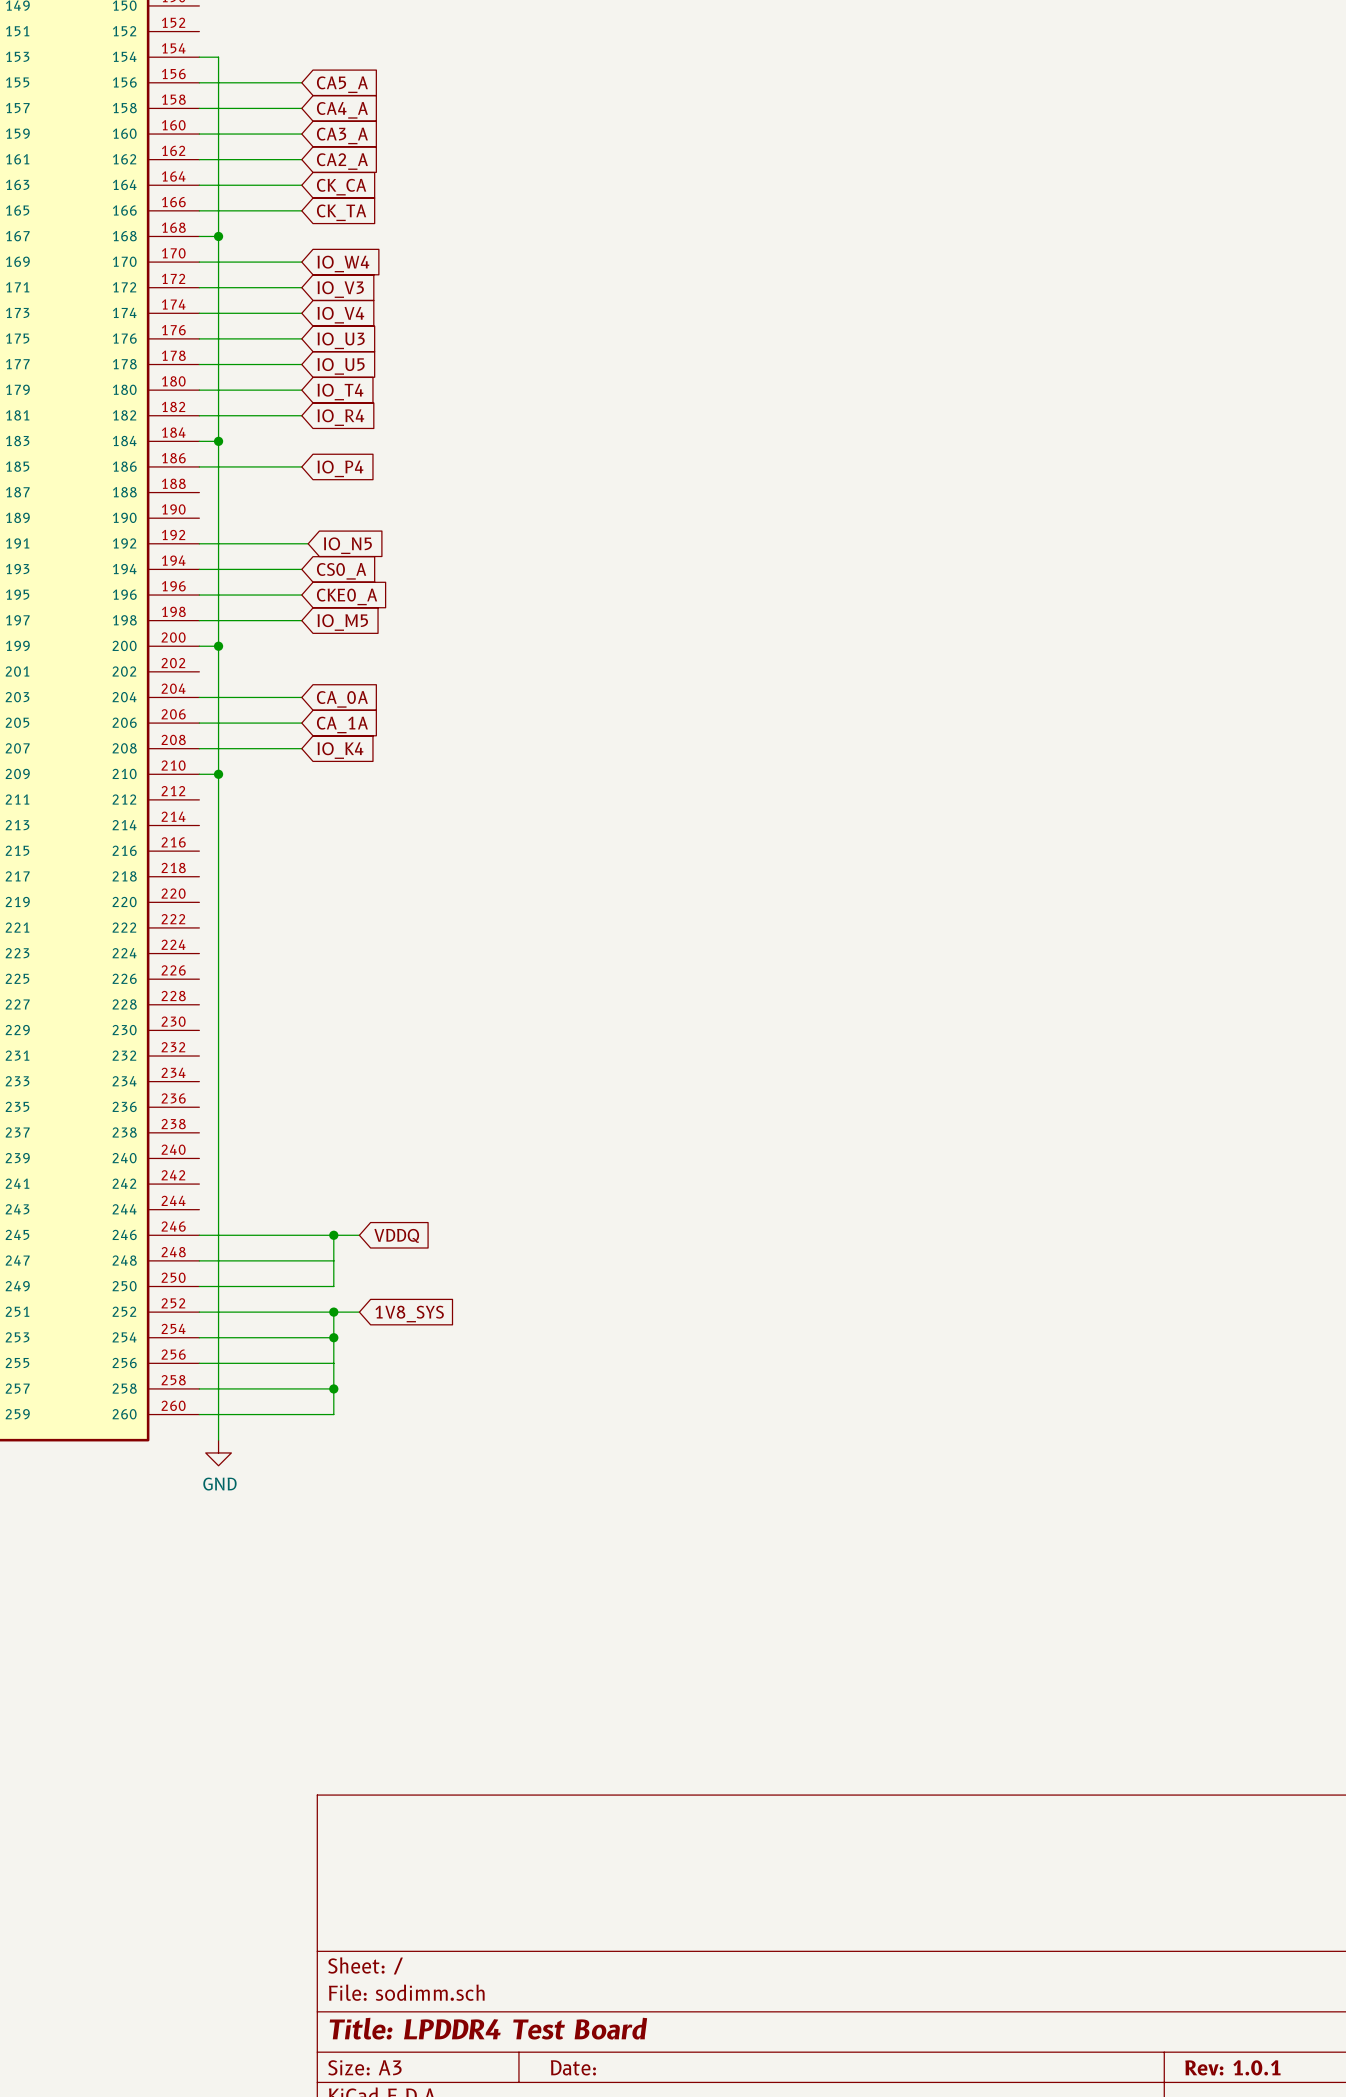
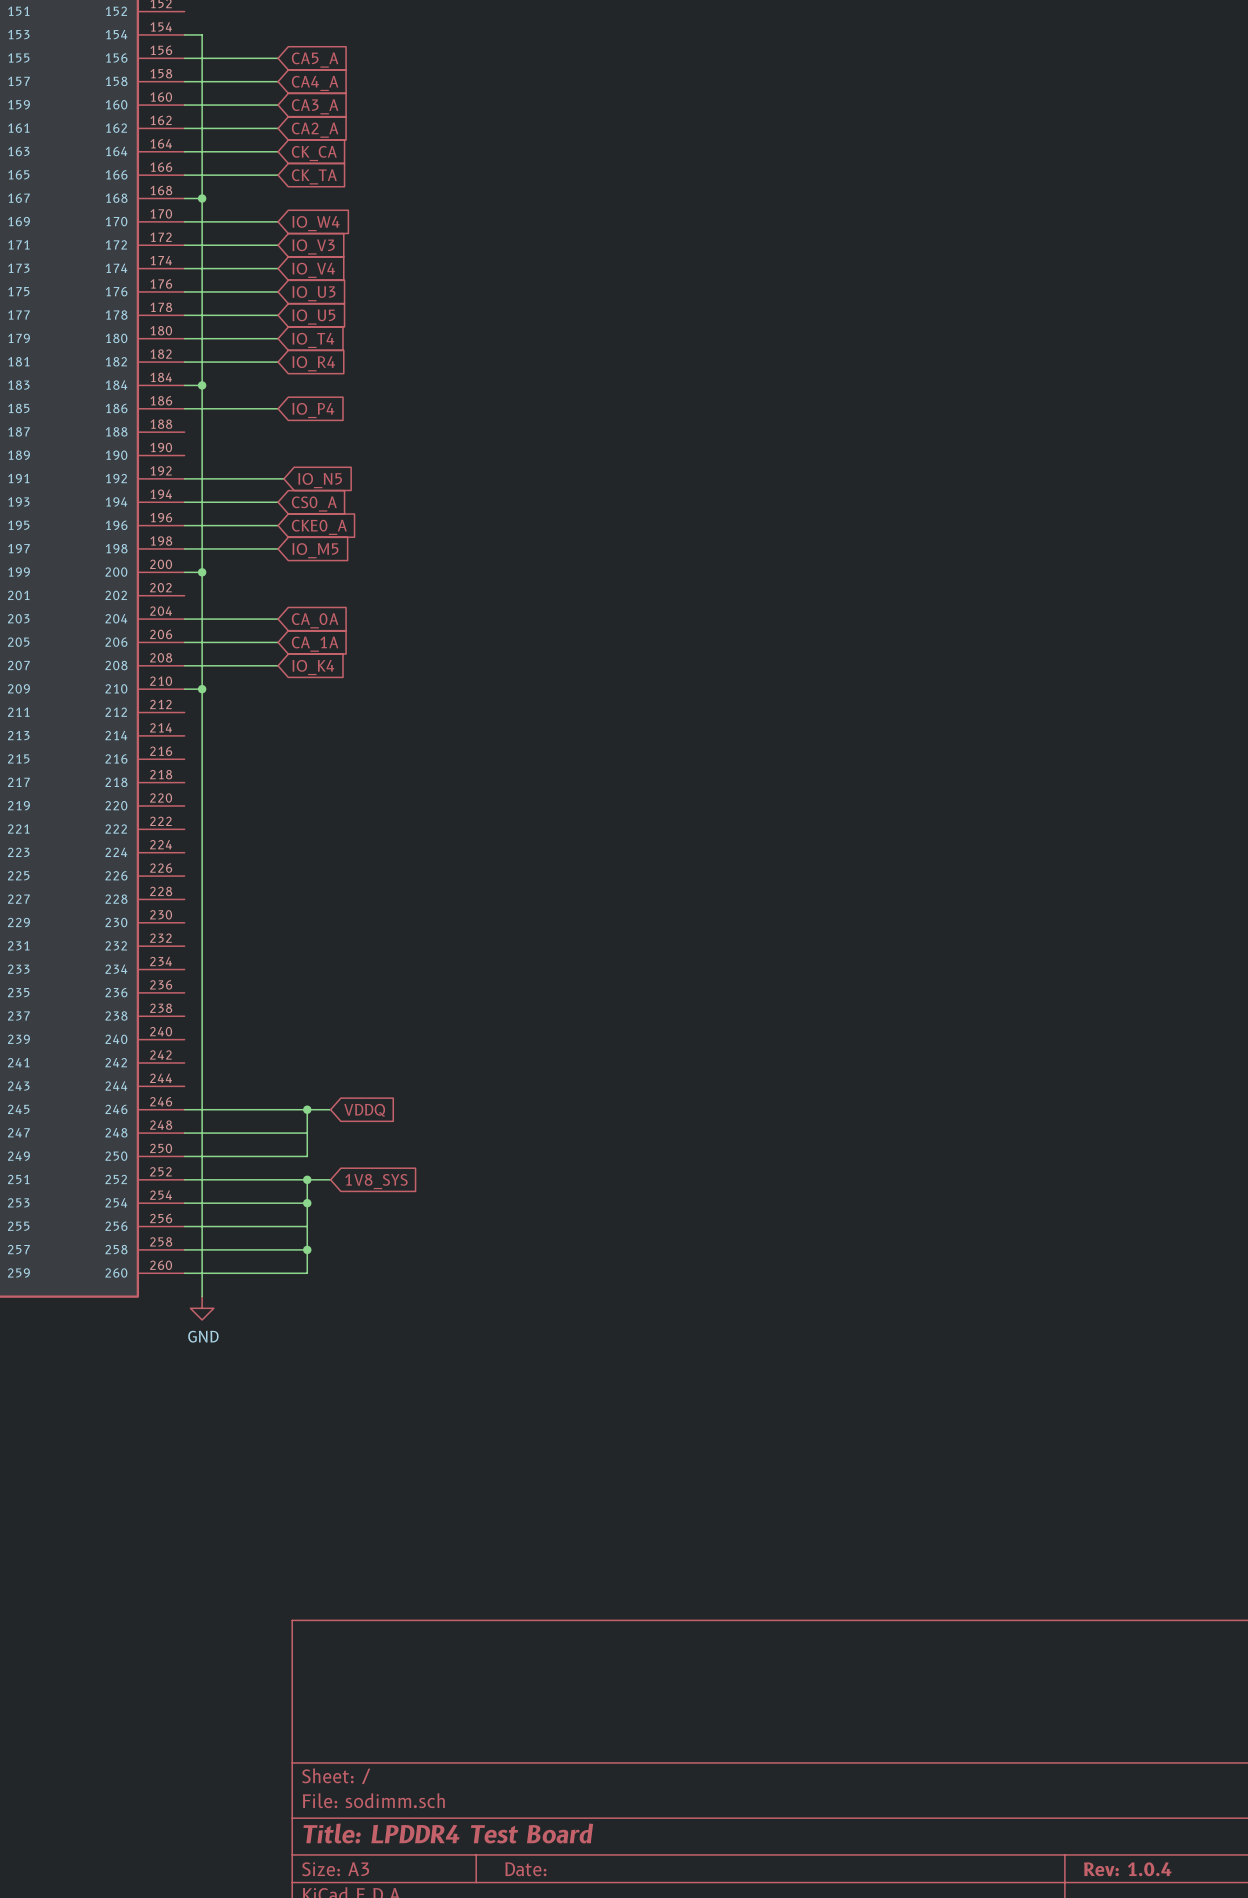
title block: Rev: 1.0.1 (1232, 2067) -> Rev: 1.0.4 (1127, 1869)

